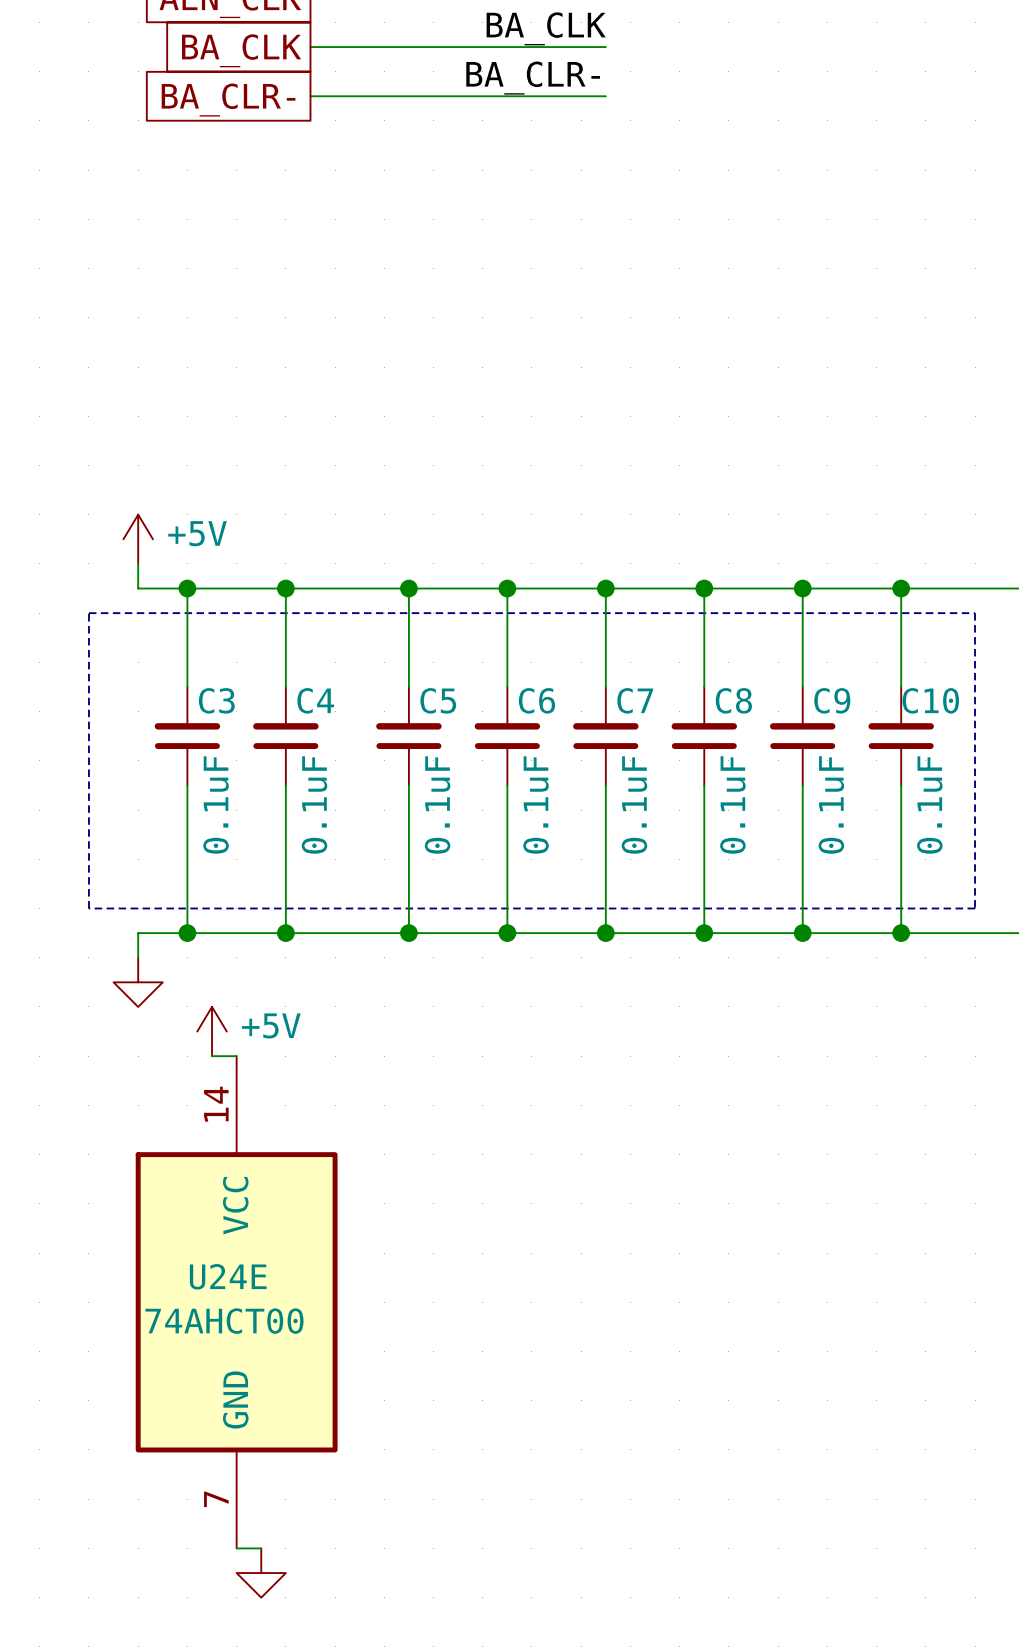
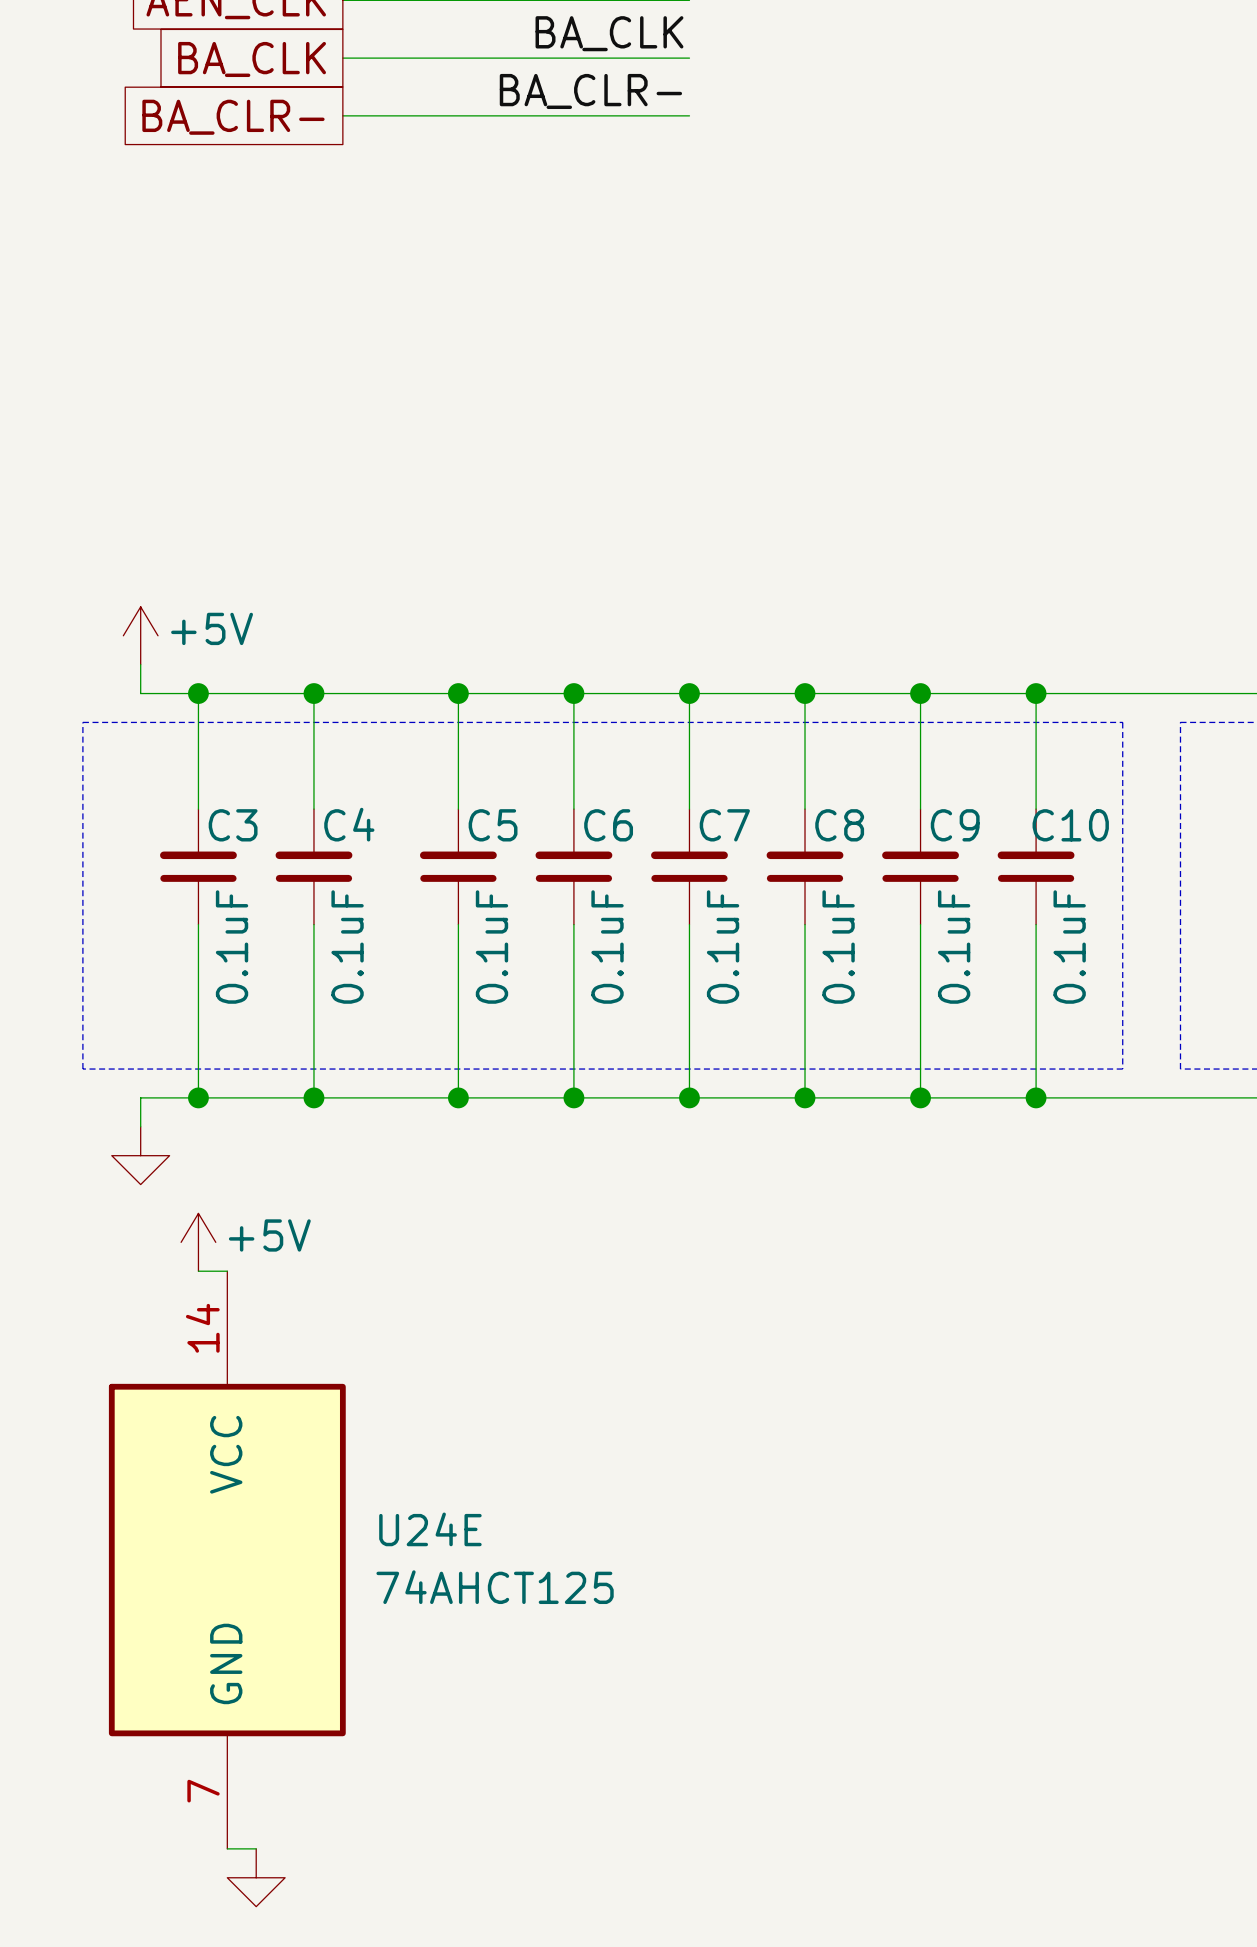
power symbol position: +5V (212, 1031) -> +5V (198, 1242)
wire: (212, 1056) (236, 1056) -> (198, 1271) (227, 1271)
U24E name position: U24E (228, 1276) -> U24E (430, 1529)
U24E position: (236, 1302) -> (227, 1560)
U24E value: 74AHCT00 (224, 1321) -> 74AHCT125 (495, 1587)
wire: (236, 1548) (261, 1548) -> (227, 1848) (256, 1848)
power symbol position: (261, 1573) -> (256, 1877)

